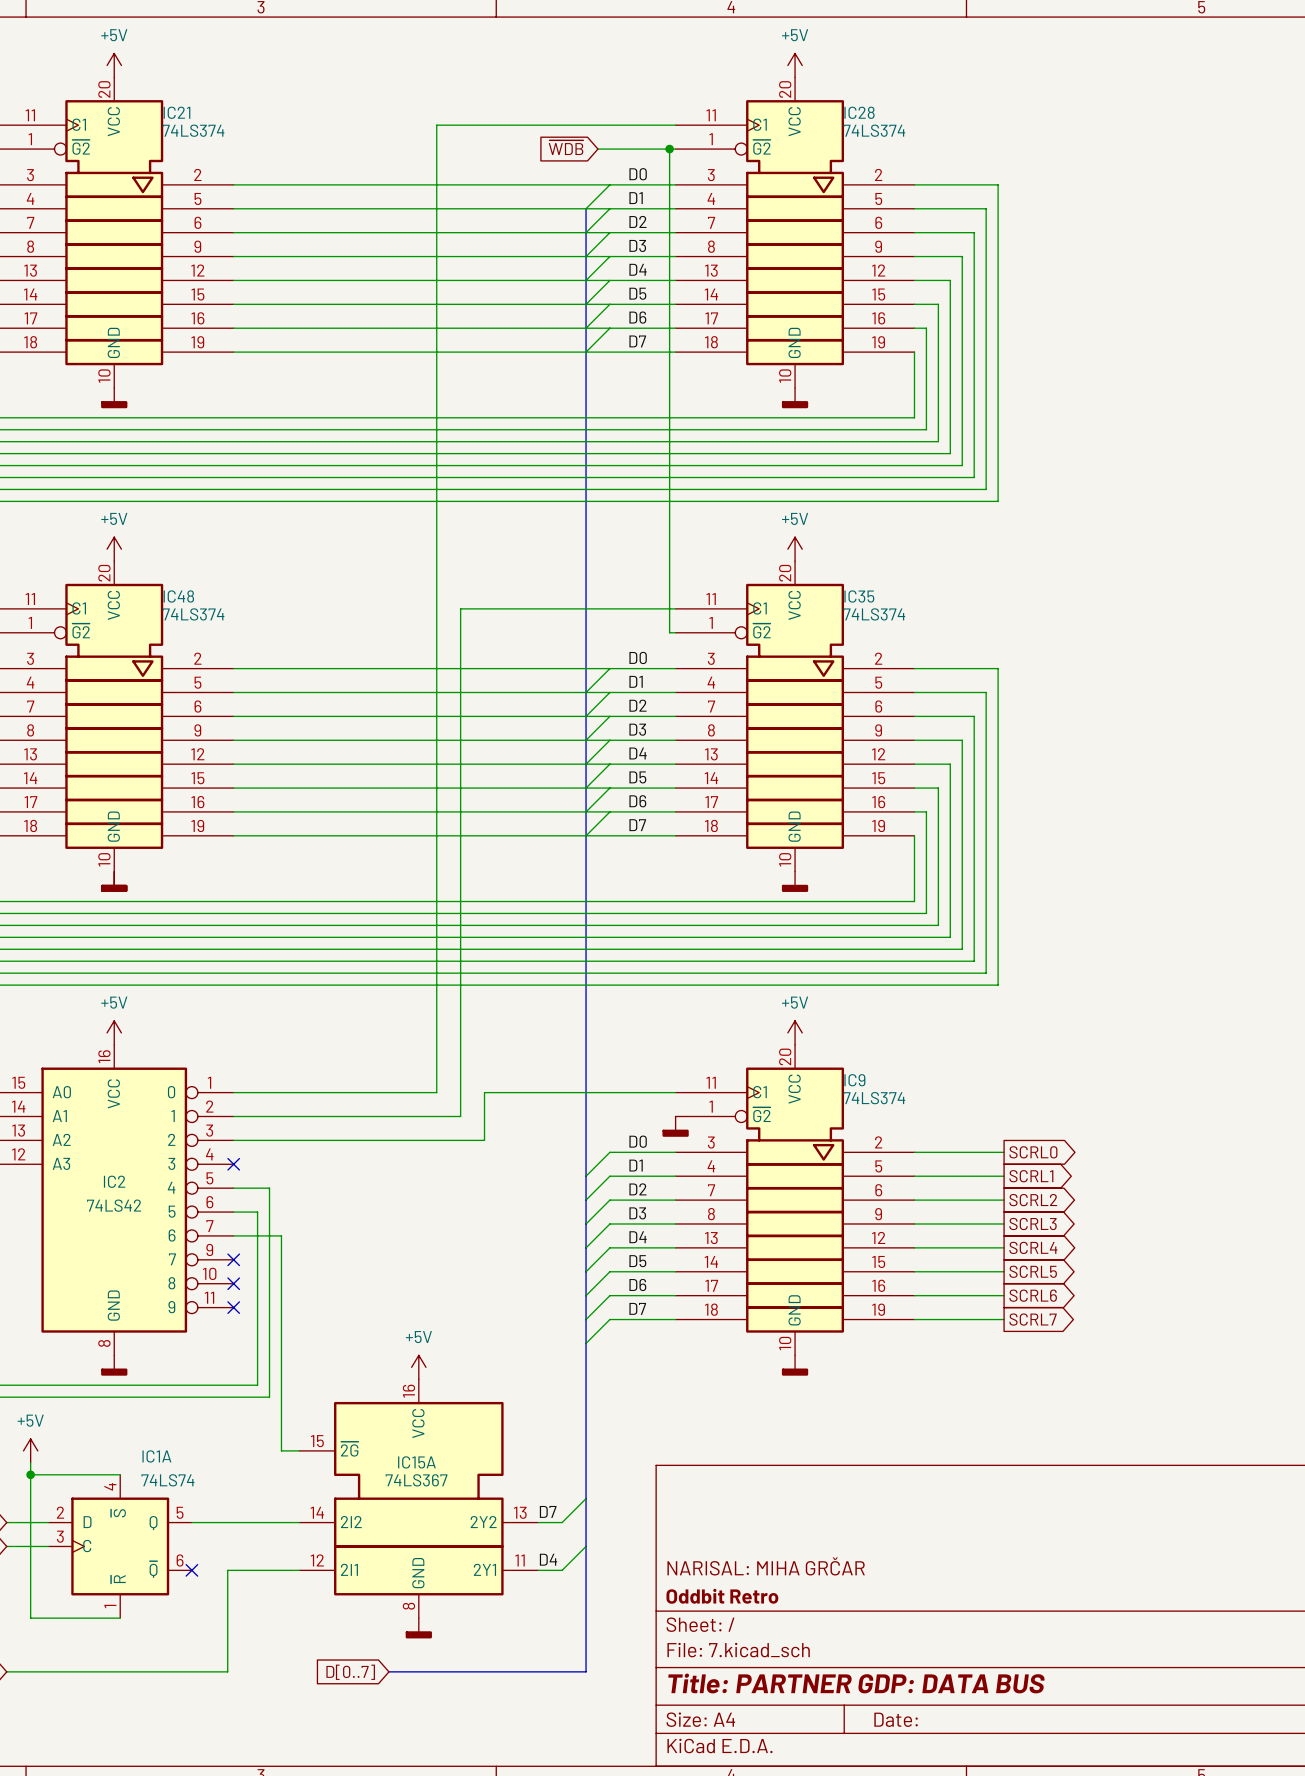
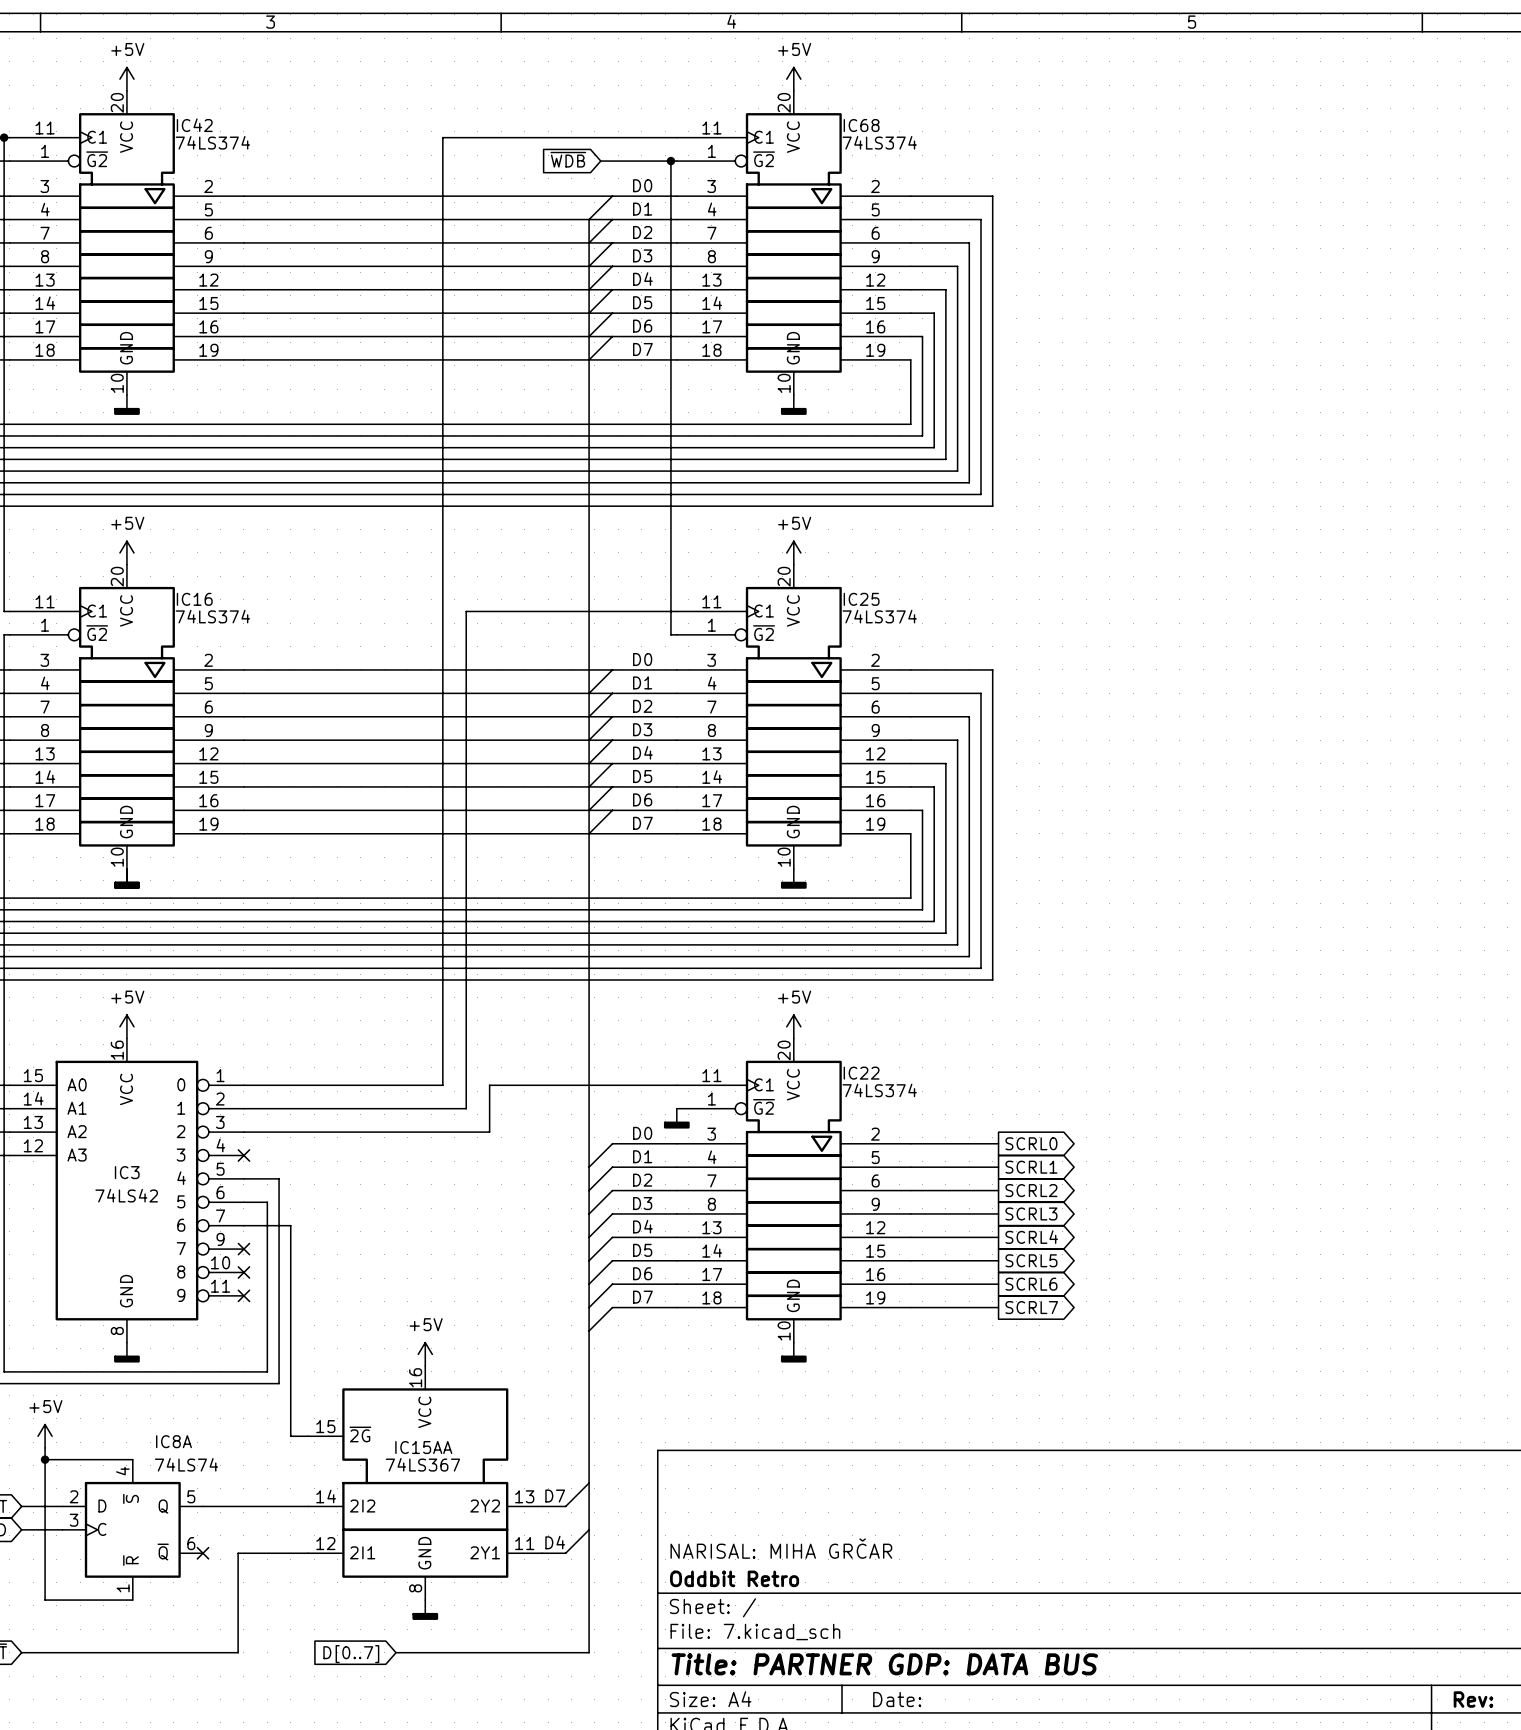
IC21 name: IC21 (176, 112) -> IC42 (194, 125)
IC28 name: IC28 (859, 112) -> IC68 (861, 125)
IC48 name: IC48 (178, 596) -> IC16 (194, 599)
IC35 name: IC35 (859, 596) -> IC25 (861, 599)
IC9 name: IC9 (854, 1080) -> IC22 (861, 1073)
IC2 name: IC2 (114, 1181) -> IC3 (127, 1172)
IC1A name: IC1A (156, 1456) -> IC8A (174, 1441)
IC15A name: IC15A (416, 1462) -> IC15AA (423, 1447)

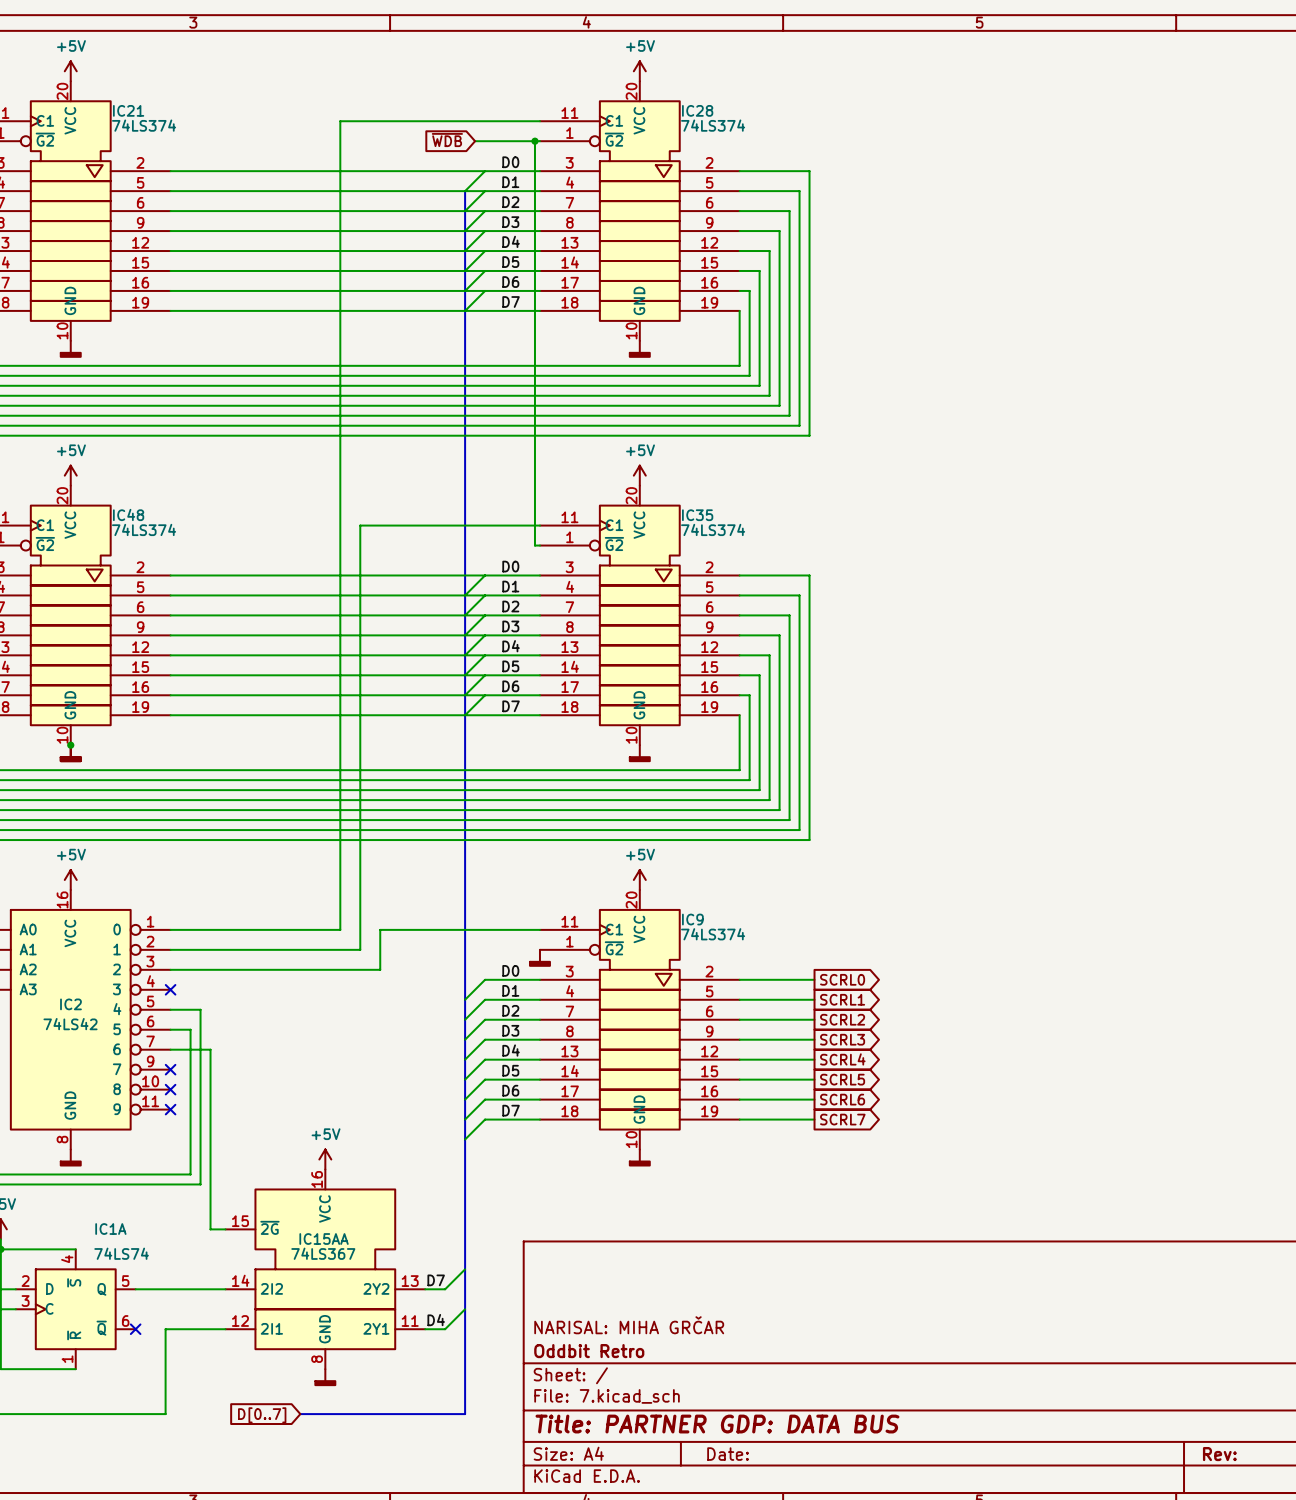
IC42 name: IC42 (194, 125) -> IC21 (128, 110)
IC68 name: IC68 (861, 125) -> IC28 (697, 110)
IC16 name: IC16 (194, 599) -> IC48 (128, 514)
IC25 name: IC25 (861, 599) -> IC35 (697, 515)
junction: none -> (70, 745)
IC22 name: IC22 (861, 1073) -> IC9 (692, 919)
IC3 name: IC3 (127, 1172) -> IC2 (70, 1004)
IC8A name: IC8A (174, 1441) -> IC1A (110, 1229)

